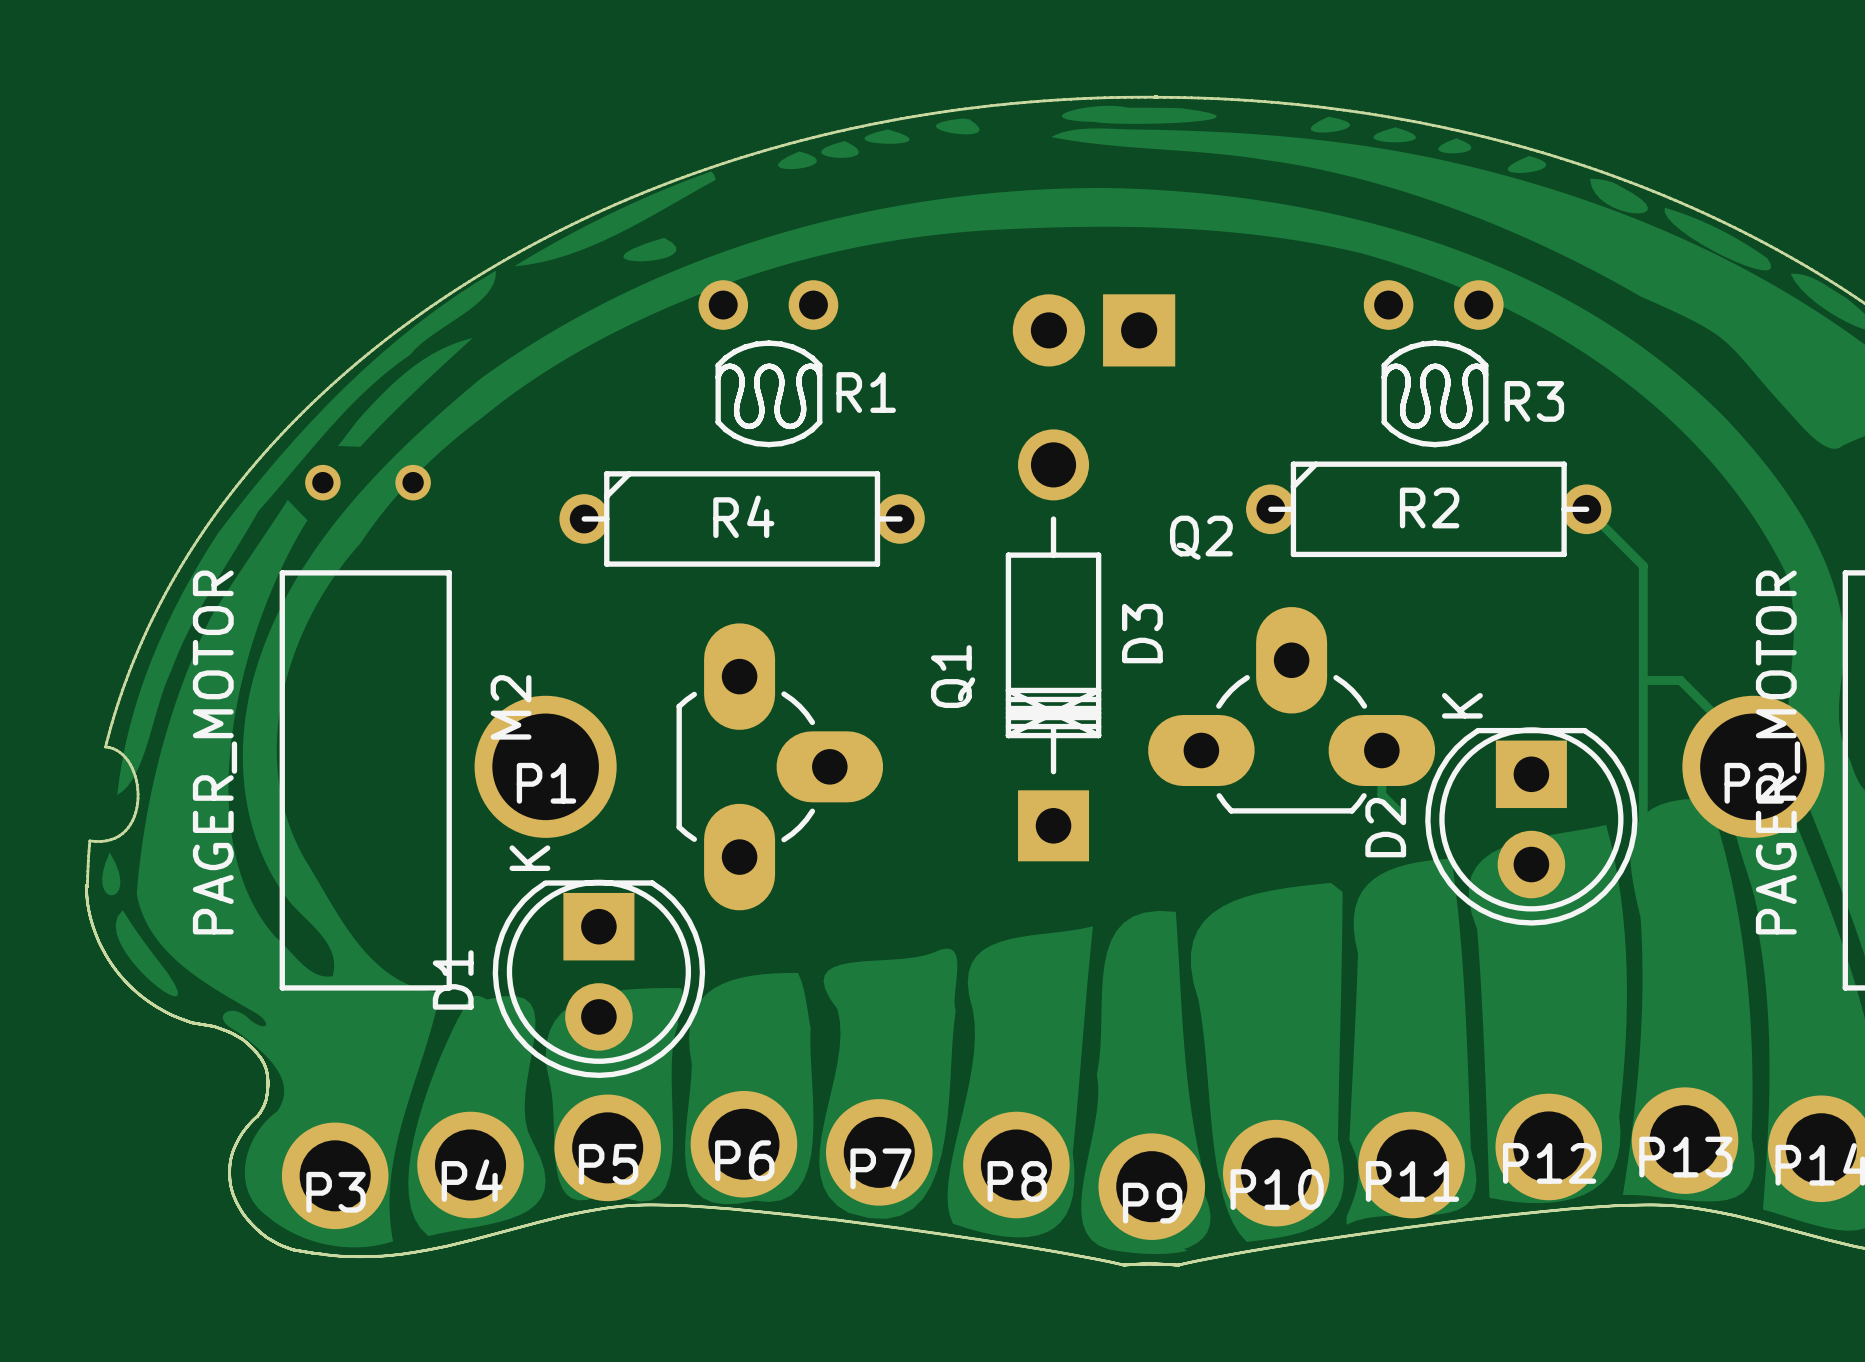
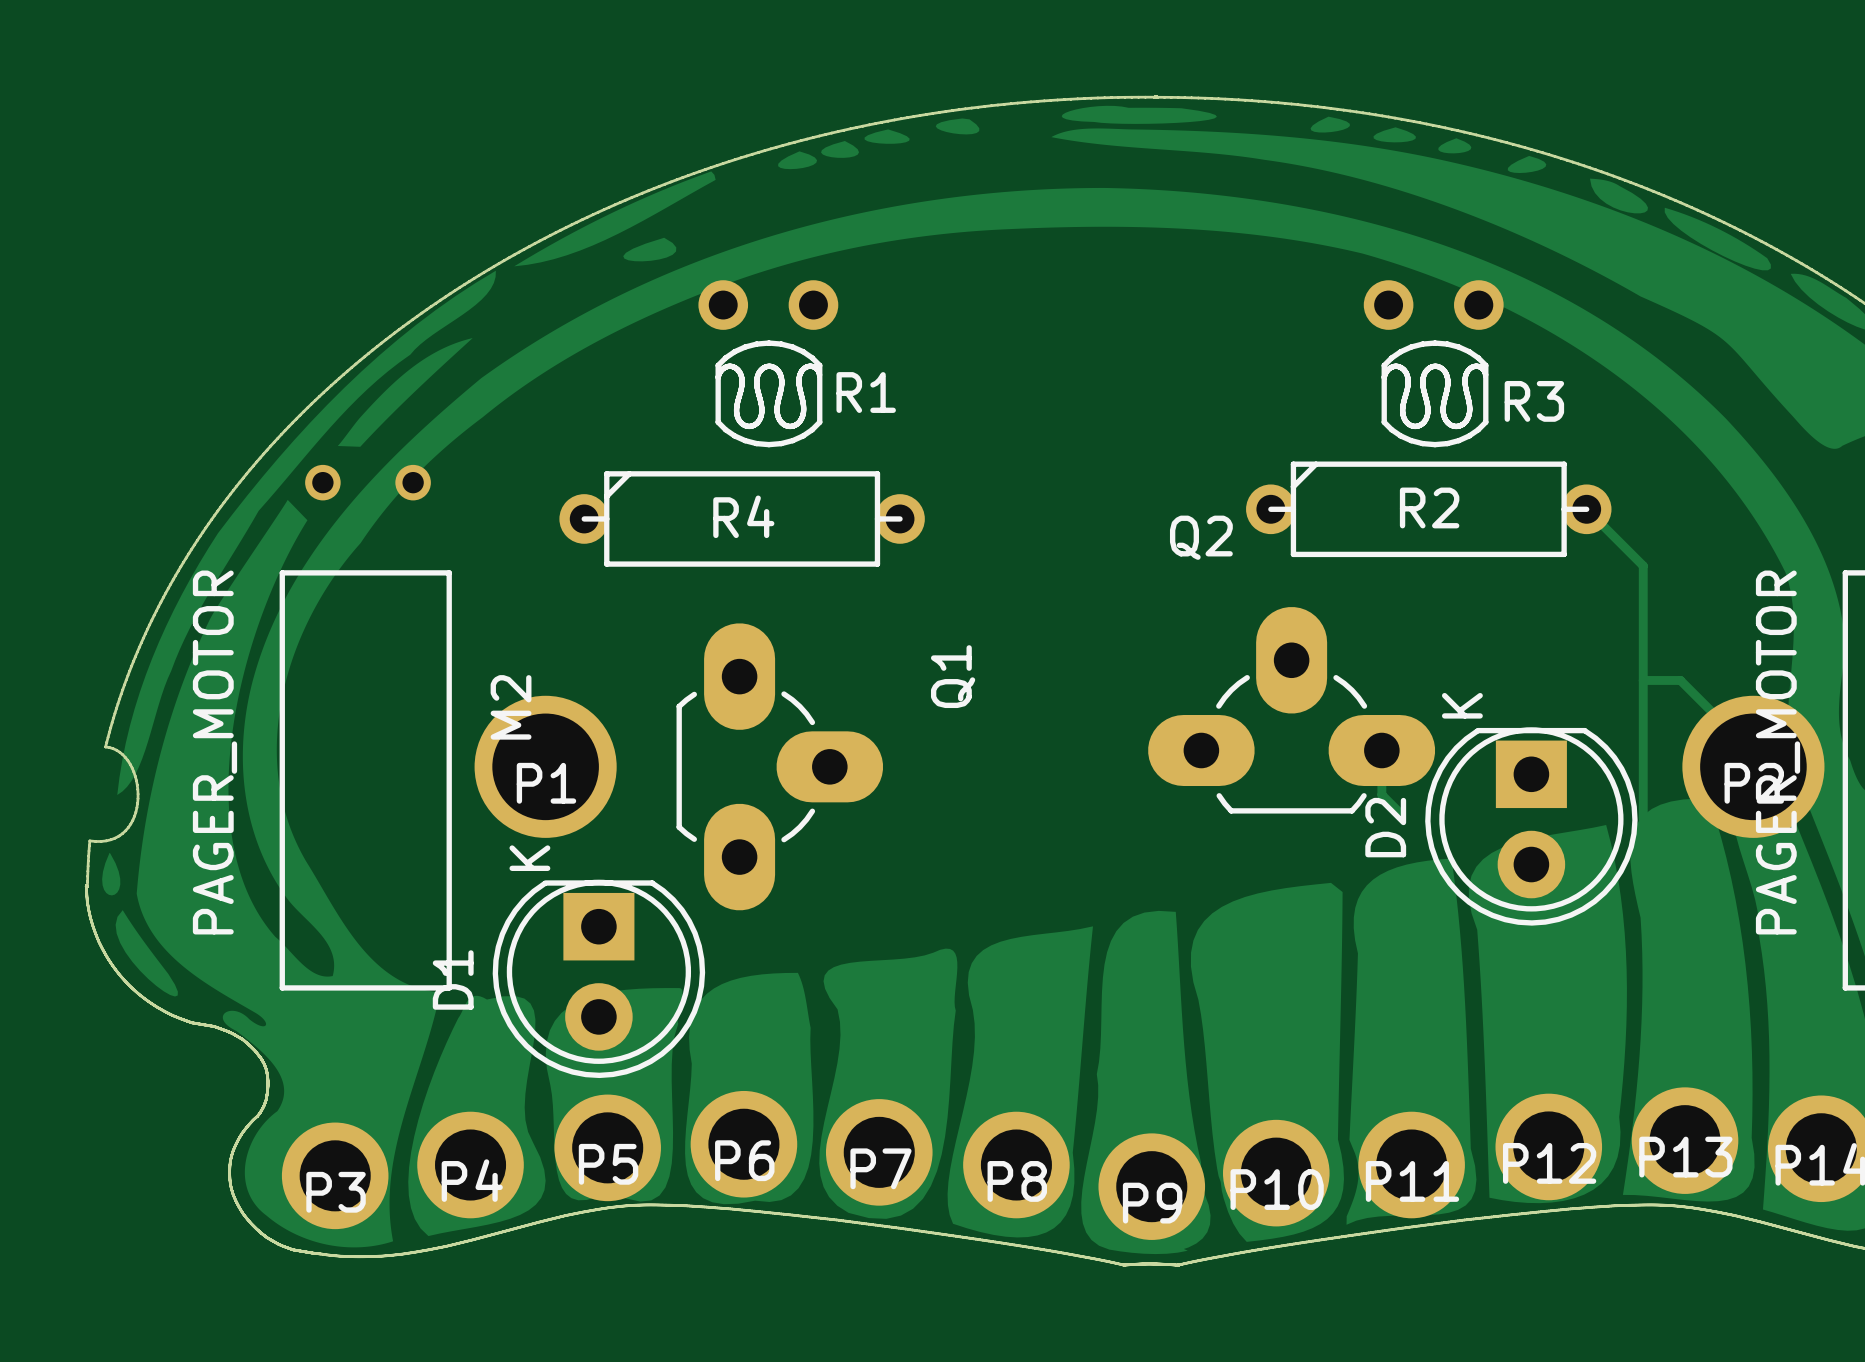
part: (1094, 330) -> none
D3: (1053, 645) -> none

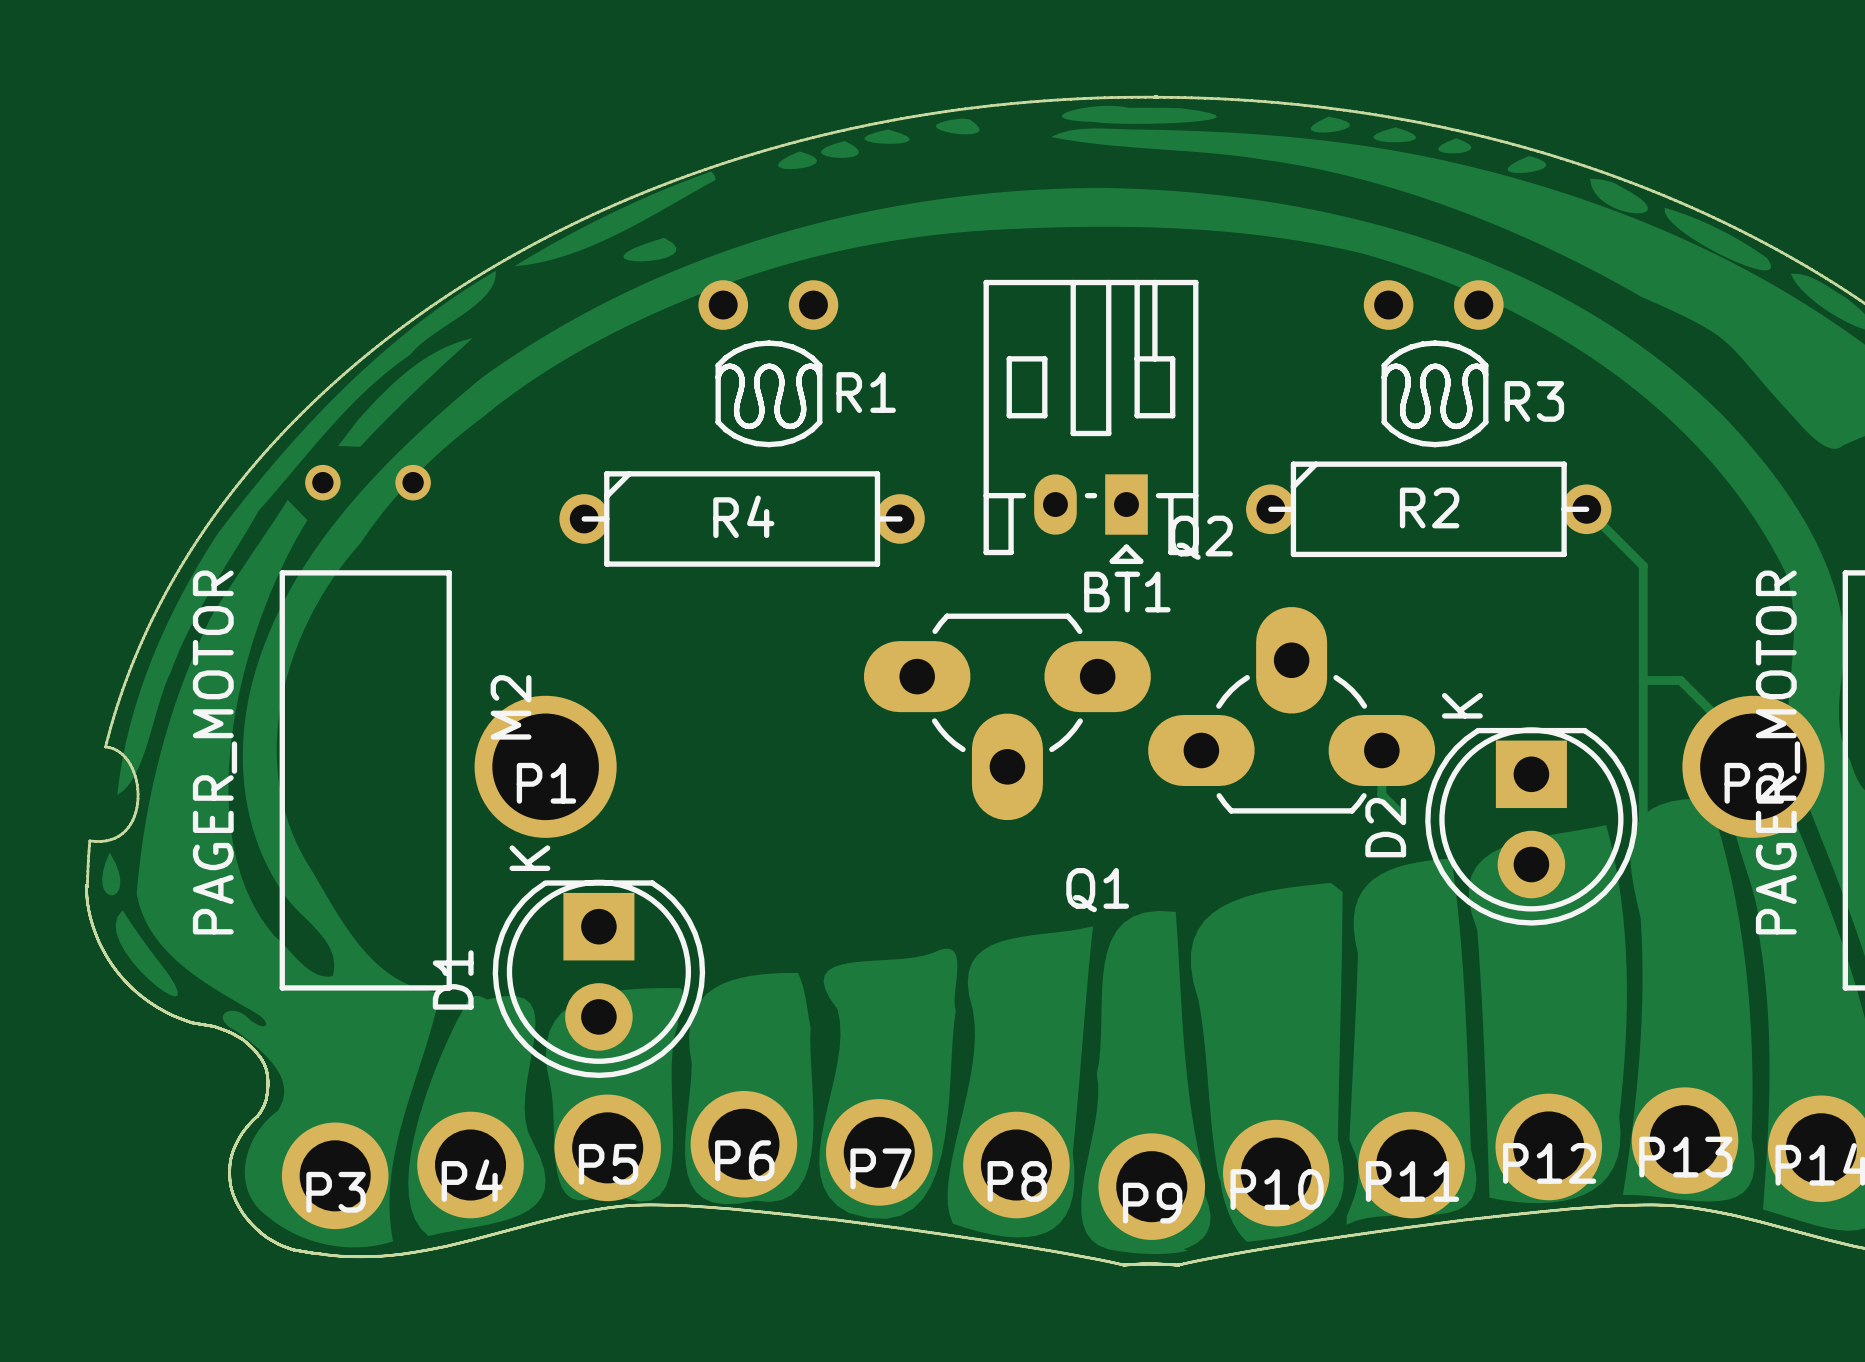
BT1: none -> (1090, 421)
Q1 rotation: 0° (779, 766) -> 90° clockwise (1007, 716)
Q1 position: (779, 766) -> (1007, 716)

